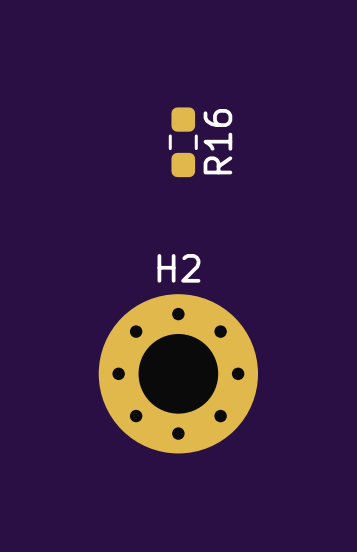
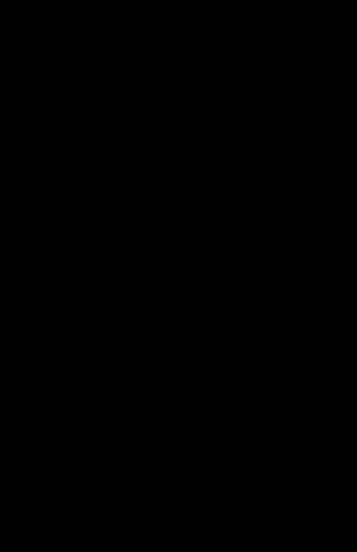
R16: (183, 142) -> none
H2: (178, 373) -> none

